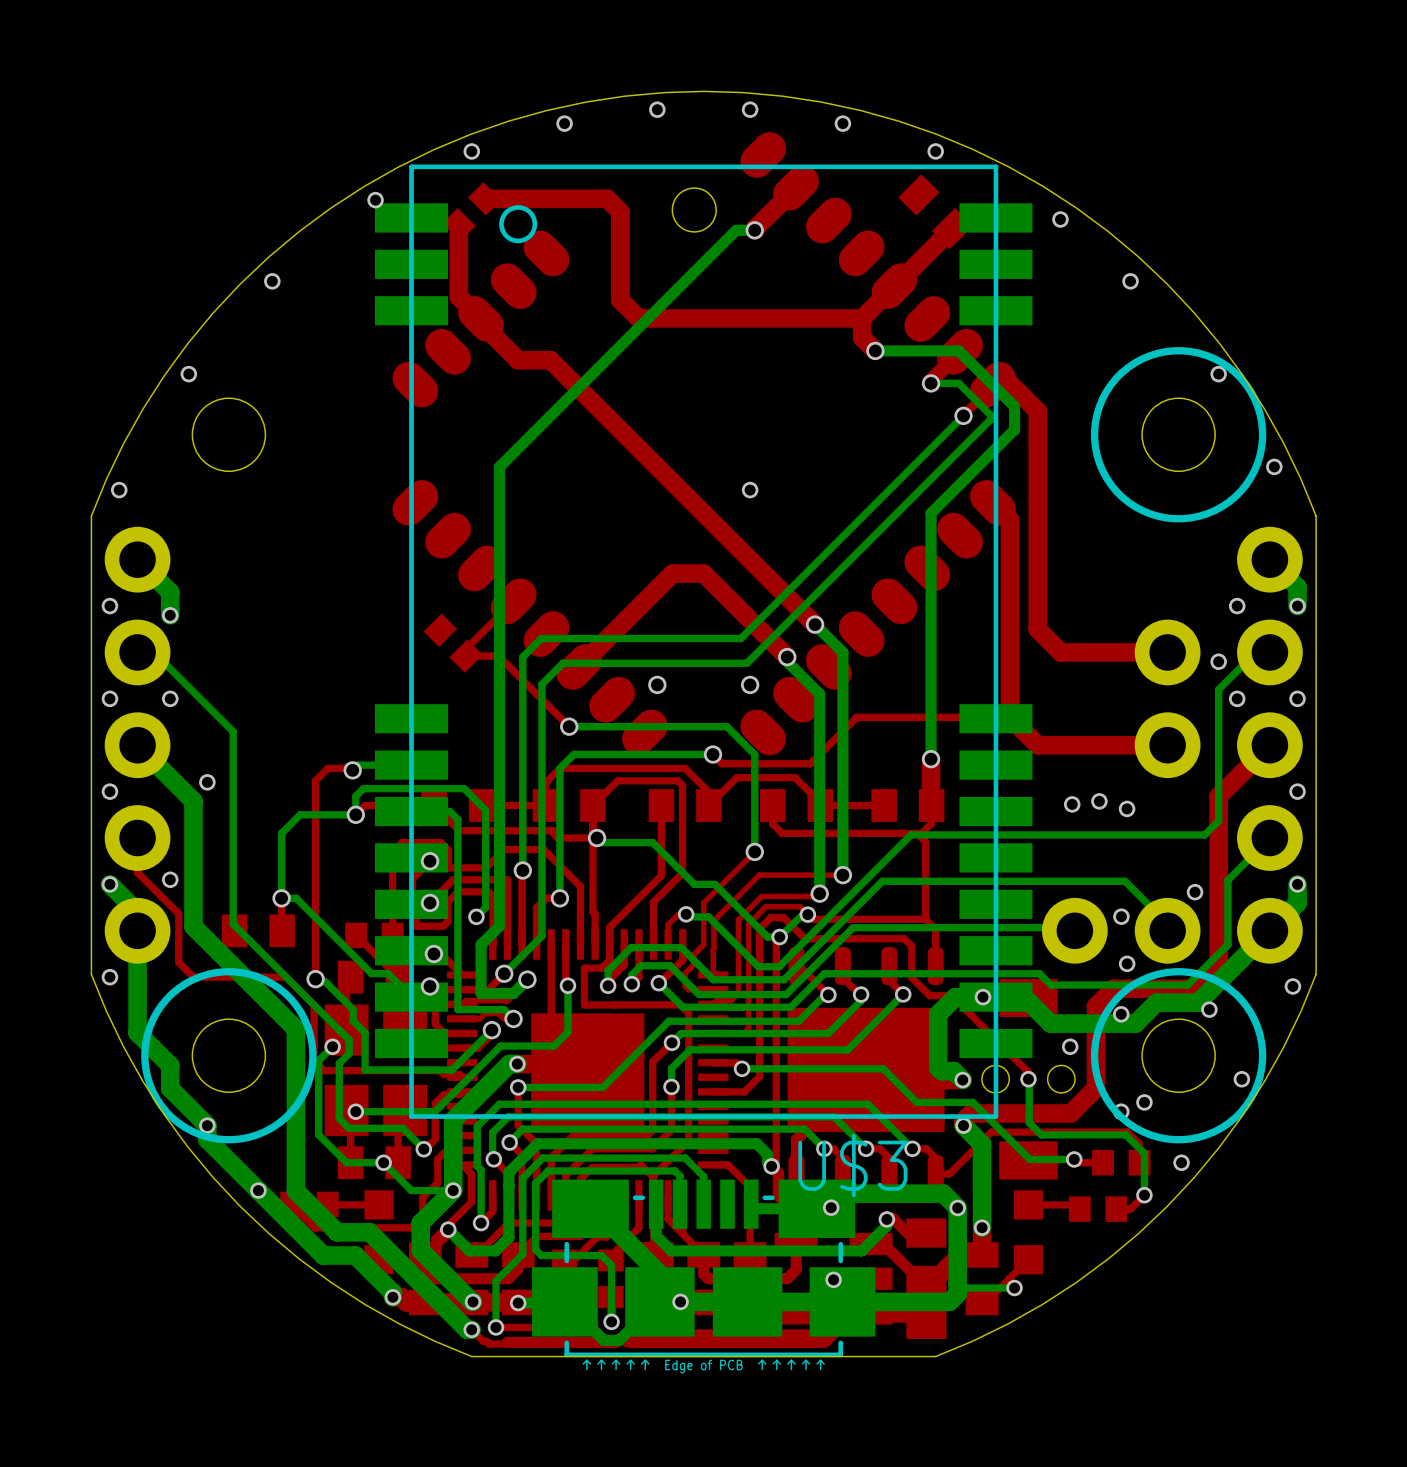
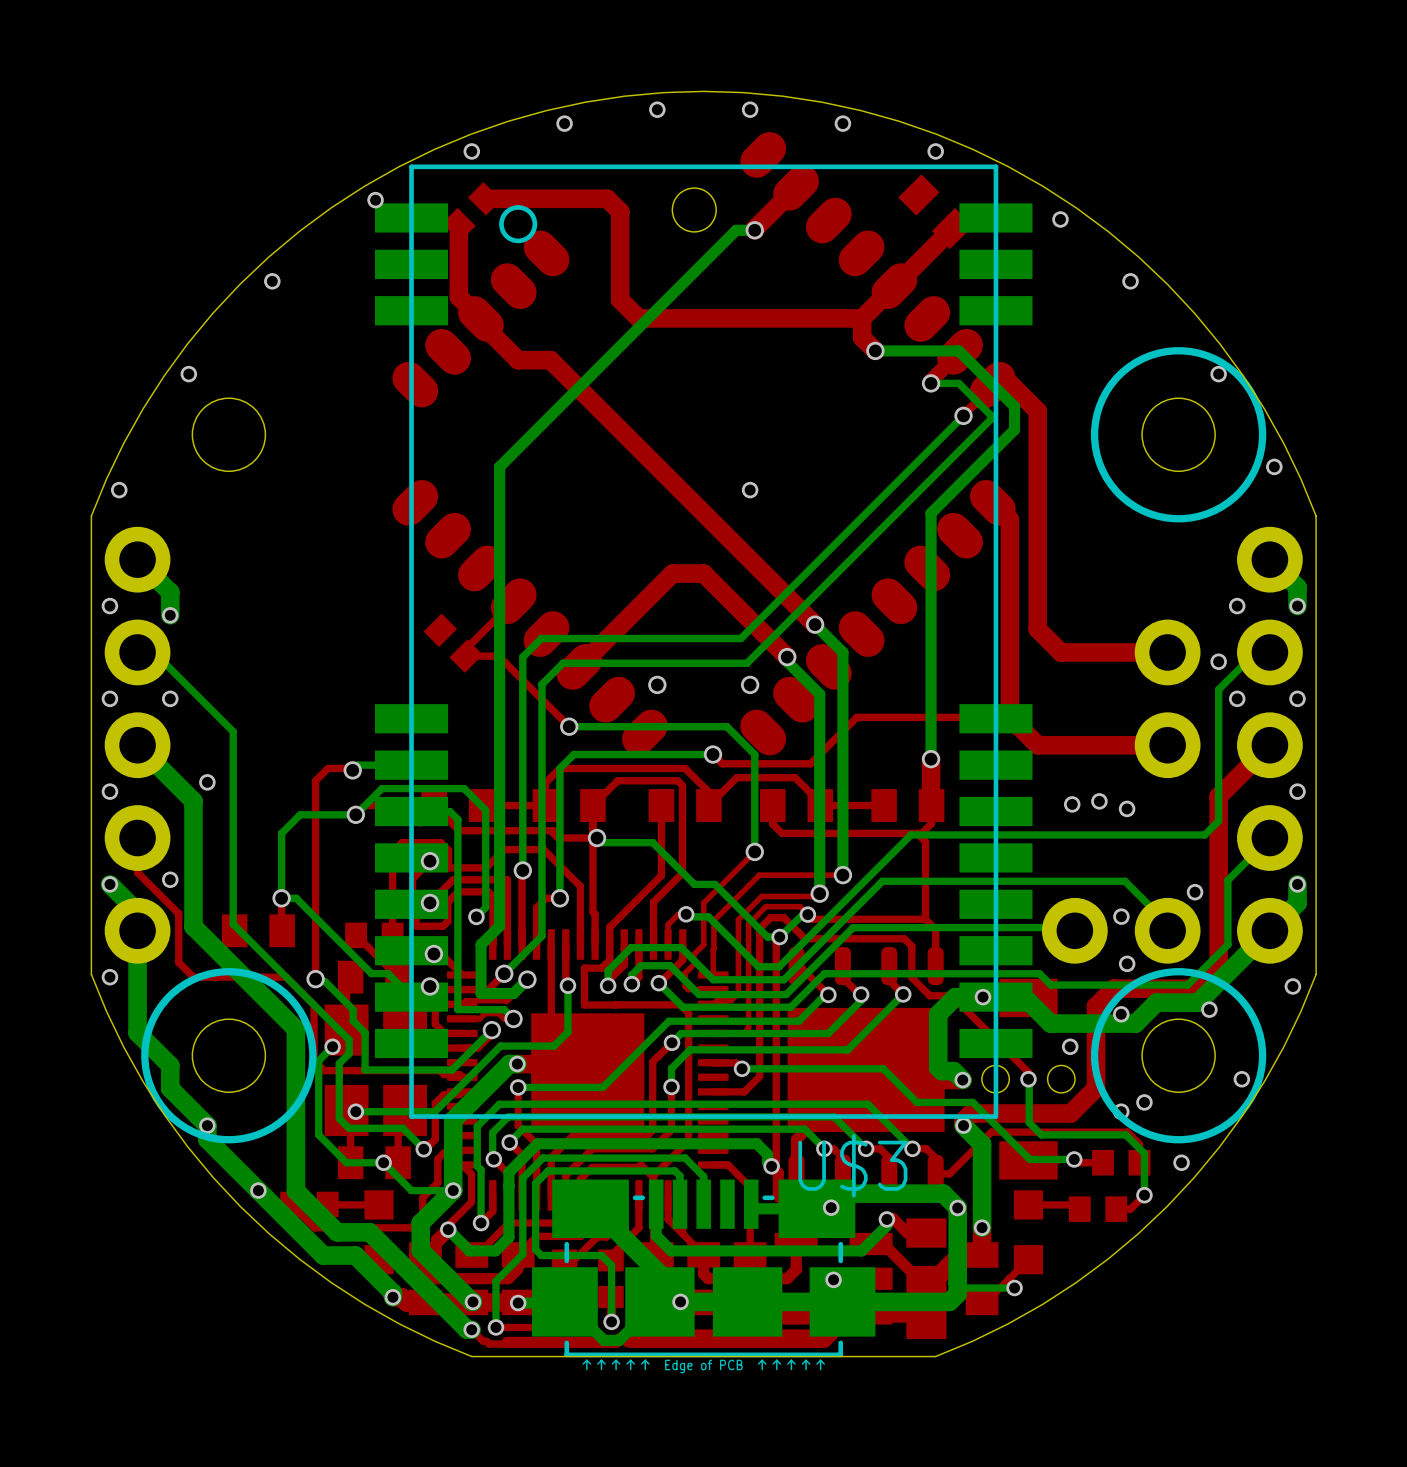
bottom track: (382, 788) (363, 788) (355, 796) (355, 814) -> (382, 788) (355, 814)

